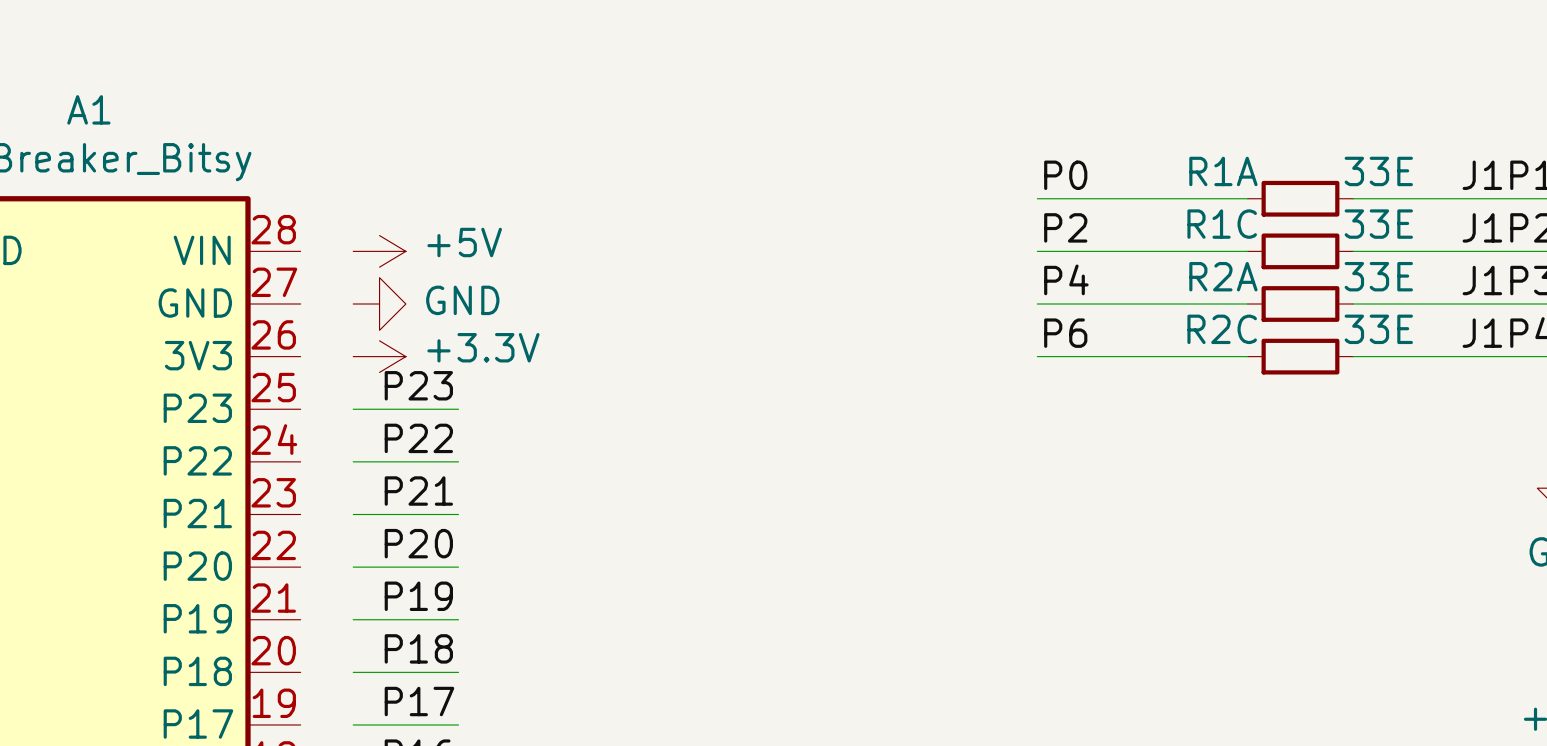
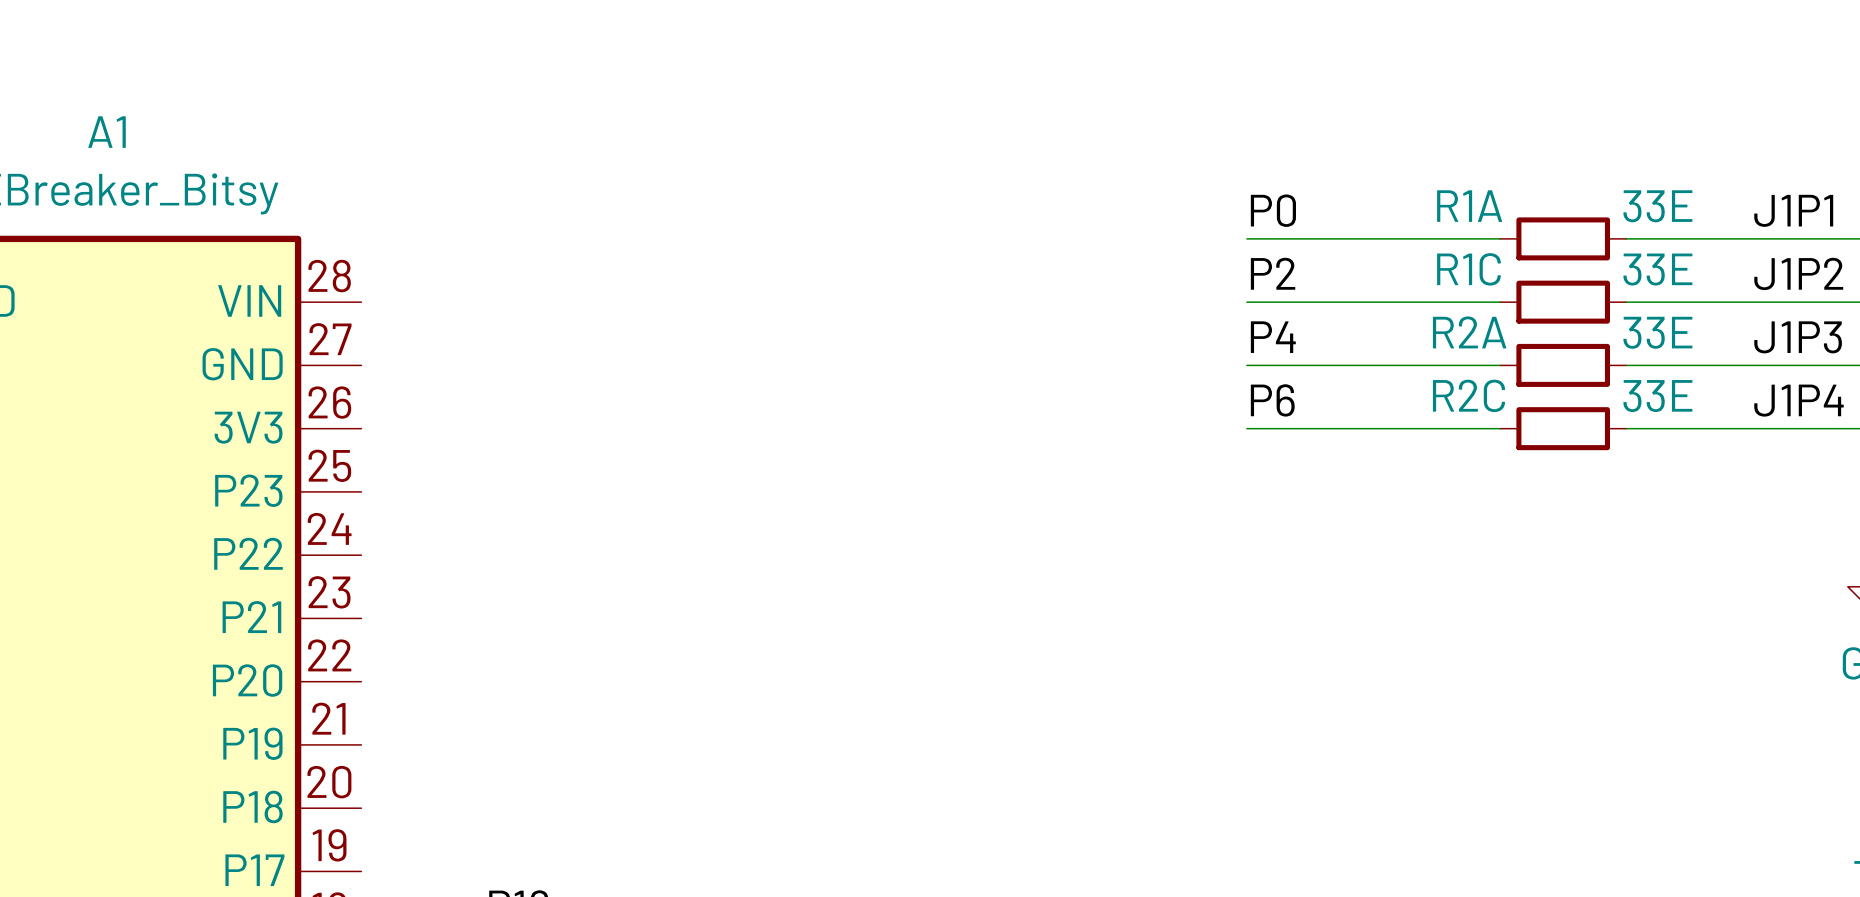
power symbol: +5V (379, 251) -> none
power symbol: GND (379, 304) -> none
power symbol: +3.3V (379, 356) -> none
label: P23 (418, 385) -> none
wire: (353, 409) (458, 409) -> none
label: P22 (418, 438) -> none
wire: (353, 461) (458, 461) -> none
label: P21 (418, 491) -> none
wire: (353, 514) (458, 514) -> none
label: P20 (418, 543) -> none
wire: (353, 567) (458, 567) -> none
label: P19 (418, 596) -> none
wire: (353, 619) (458, 619) -> none
label: P18 (418, 648) -> none
wire: (353, 672) (458, 672) -> none
label: P17 (419, 701) -> none
wire: (353, 724) (458, 724) -> none

